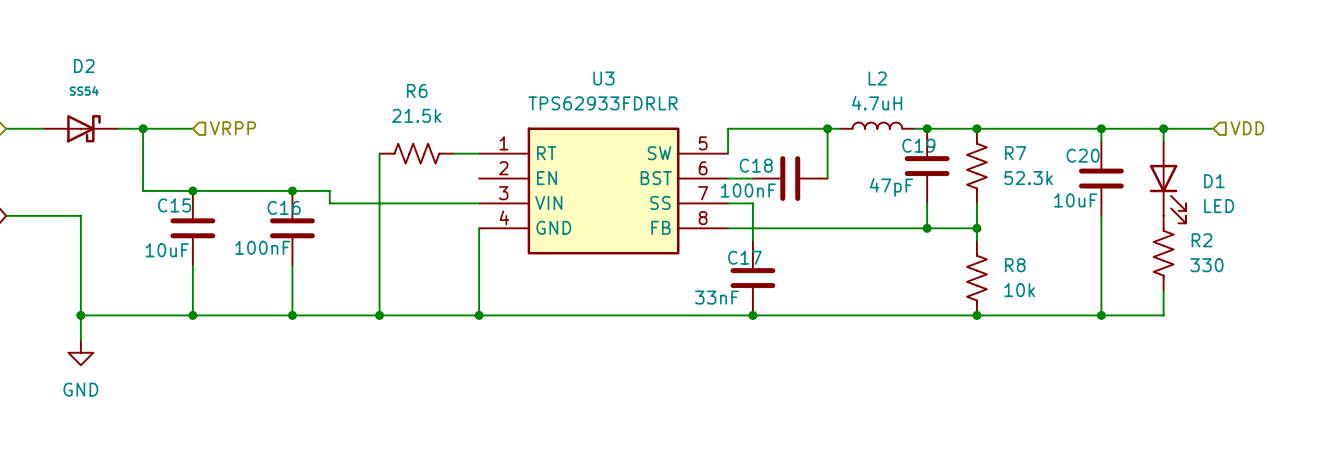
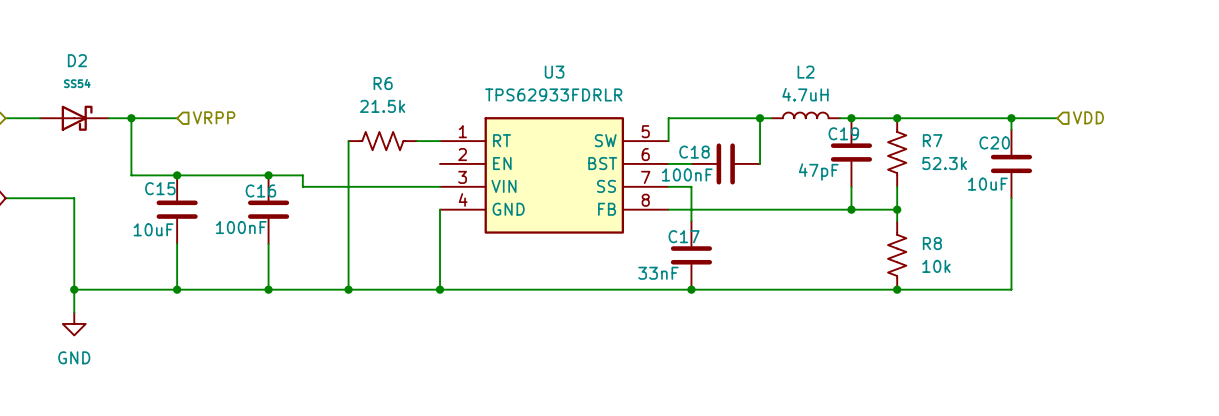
wire: (1151, 128) (1213, 128) -> none
junction: (1163, 128) -> none
hierarchical label position: VDD (1247, 128) -> VDD (1088, 117)
D1: LED (1167, 182) -> none
R2: 330 (1163, 253) -> none
wire: (1163, 290) (1163, 315) (1101, 315) -> none
junction: (1101, 315) -> none

